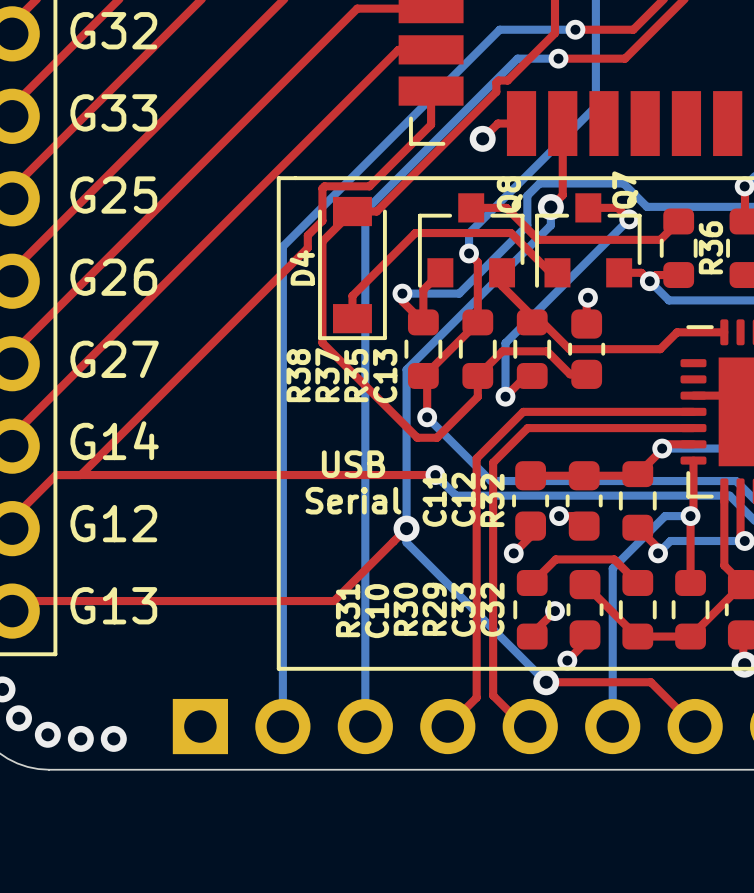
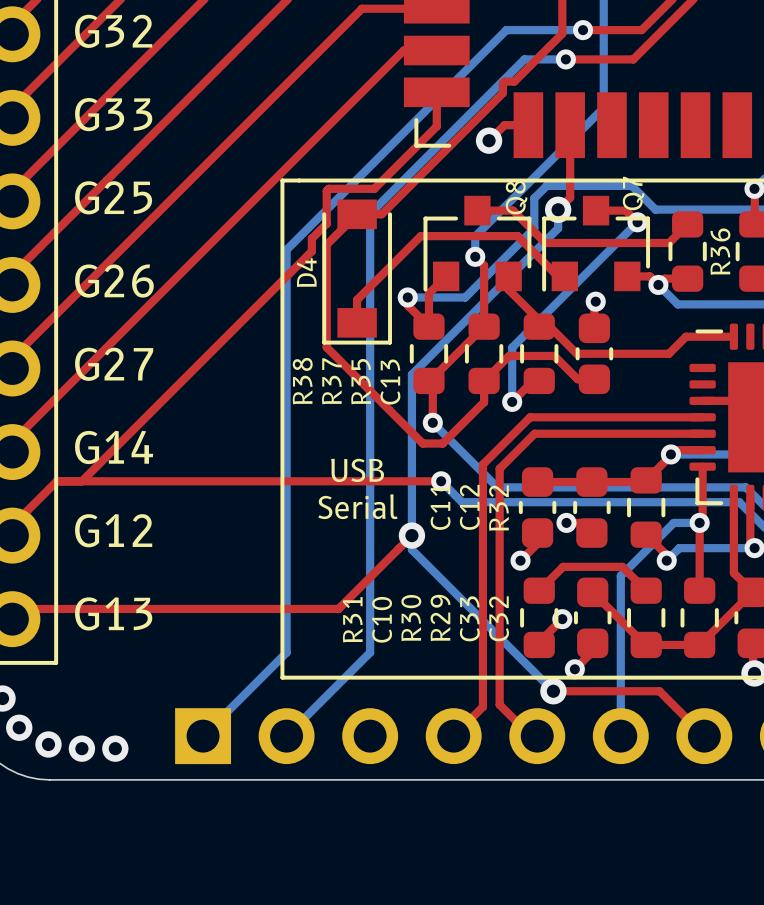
bottom track: (282, 644) (282, 726) -> (370, 652) (286, 736)
bottom track: none -> (286, 652) (203, 736)
bottom track: (365, 644) (365, 726) -> none

